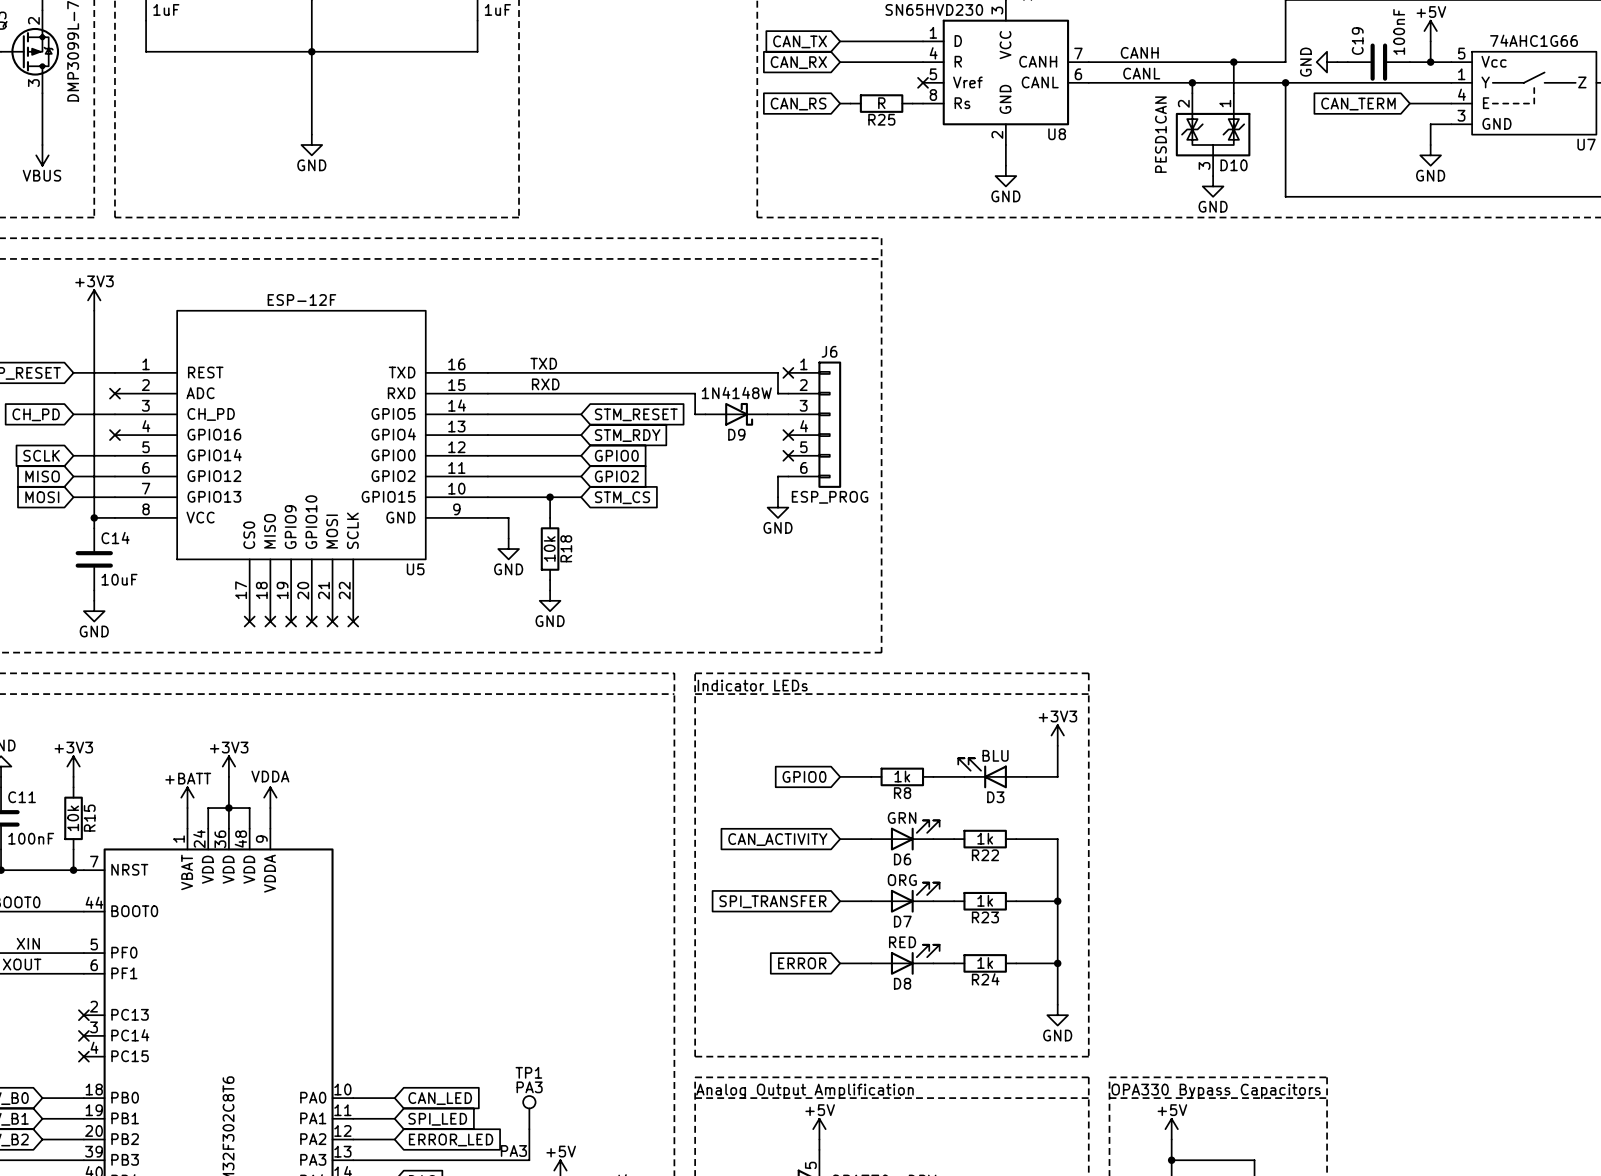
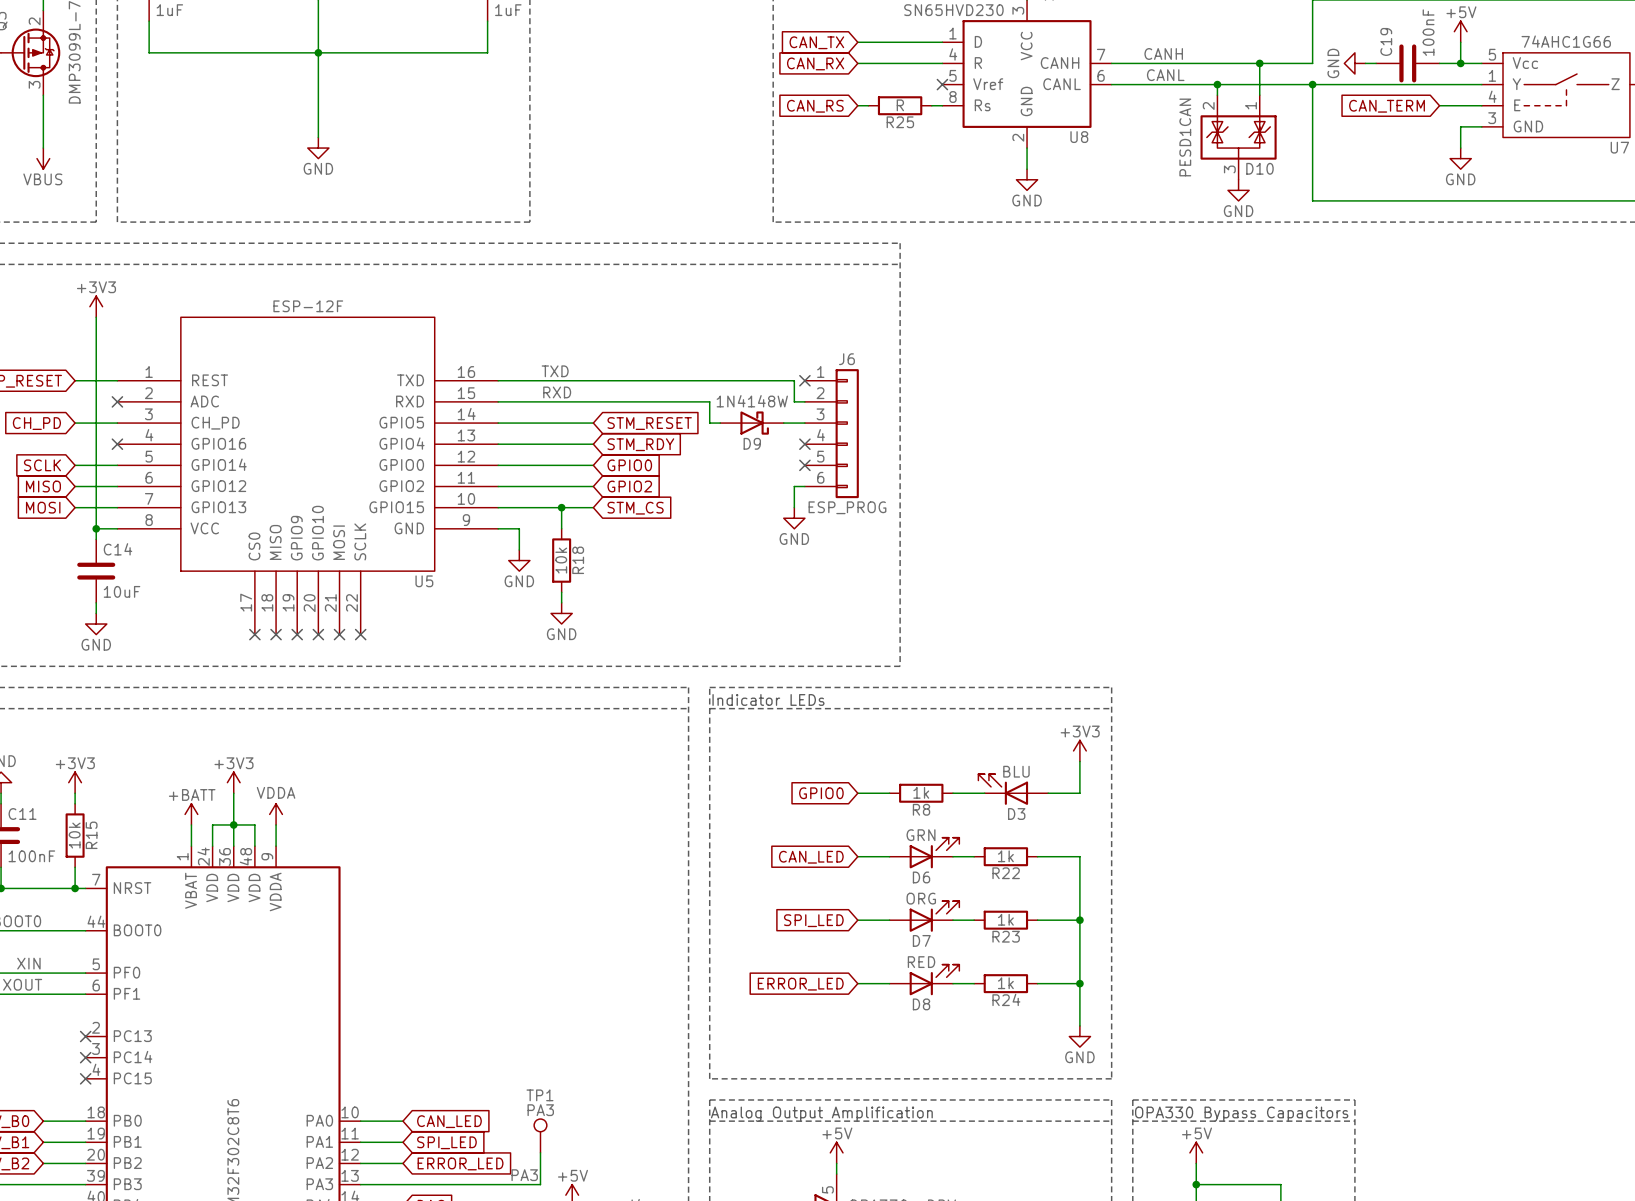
global label: CAN_ACTIVITY (777, 839) -> CAN_LED (811, 857)
global label: SPI_TRANSFER (772, 901) -> SPI_LED (813, 920)
global label: ERROR (802, 963) -> ERROR_LED (800, 984)

